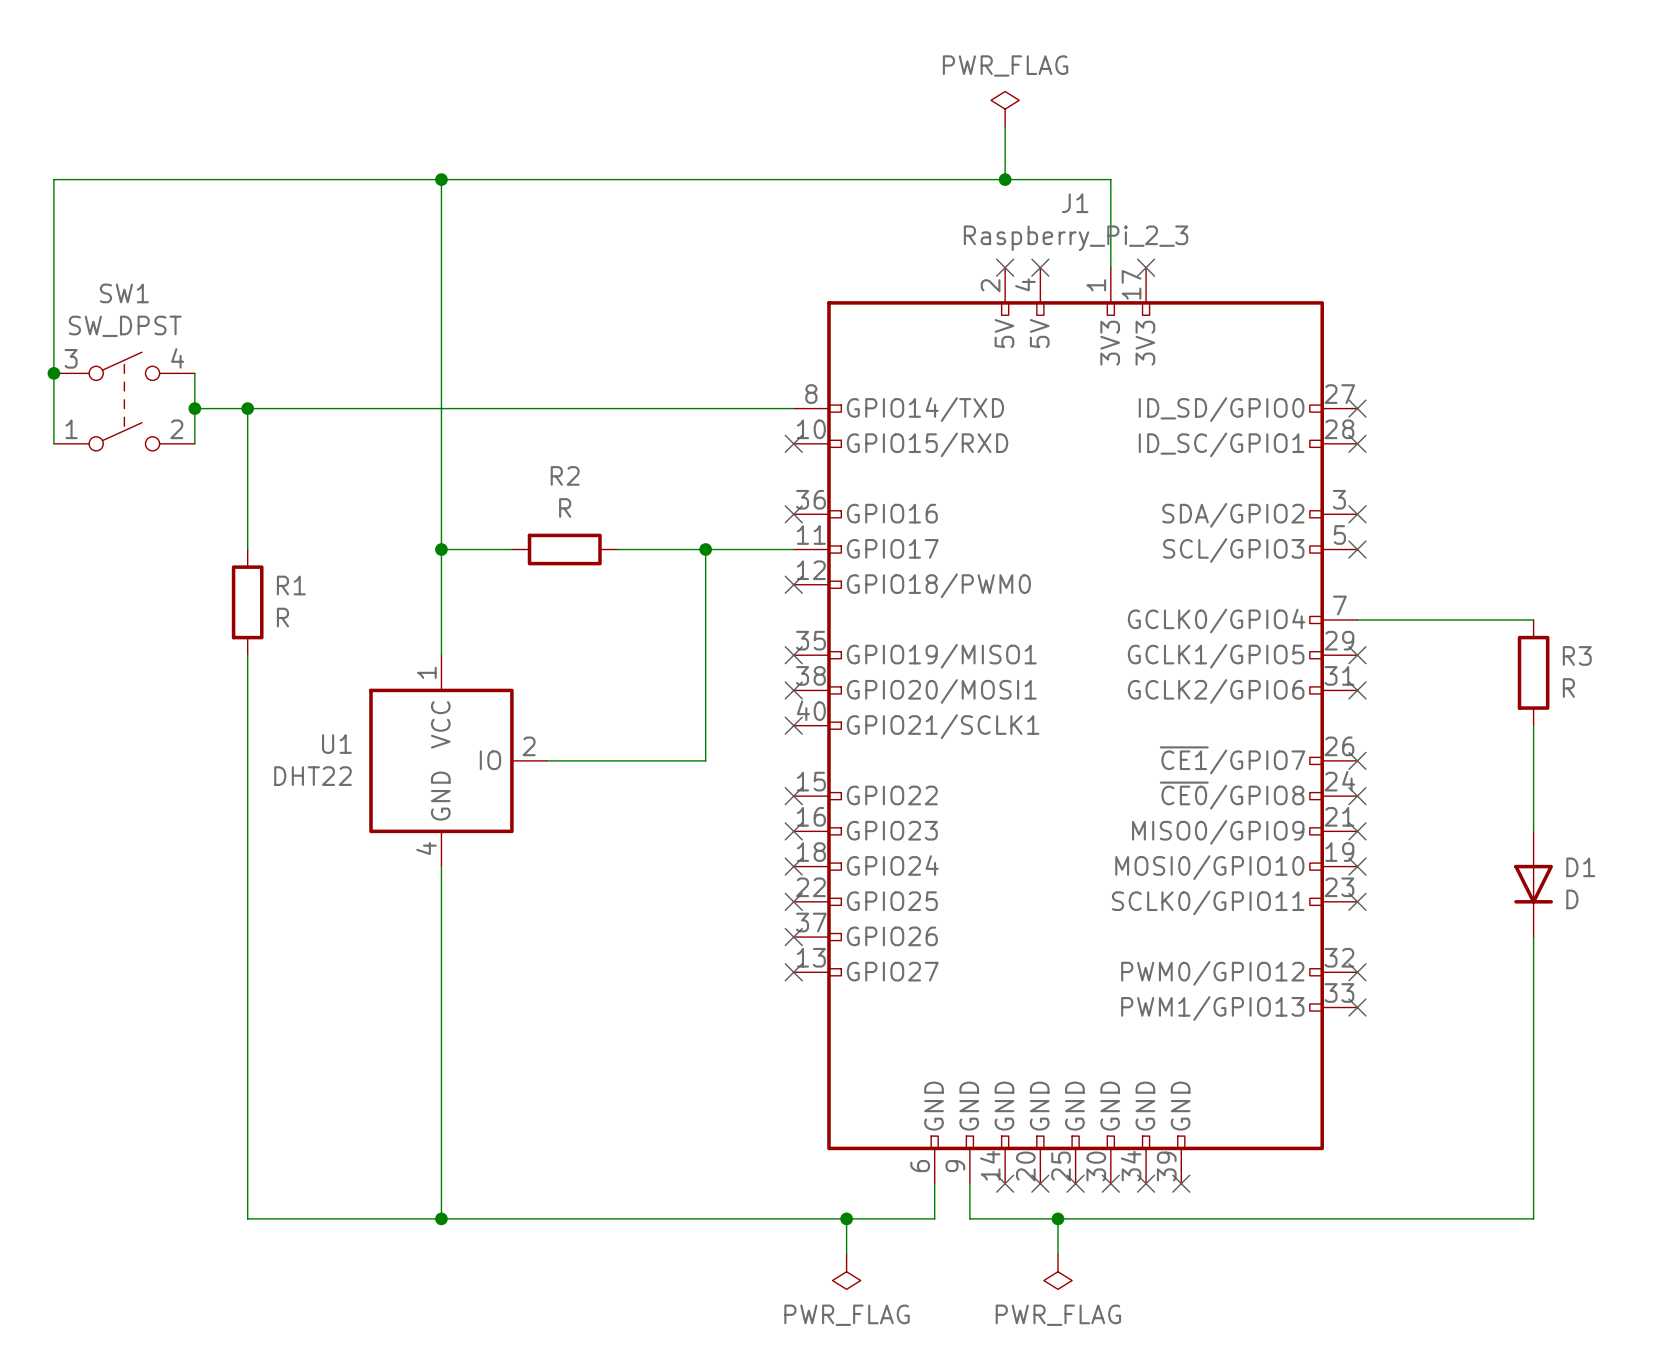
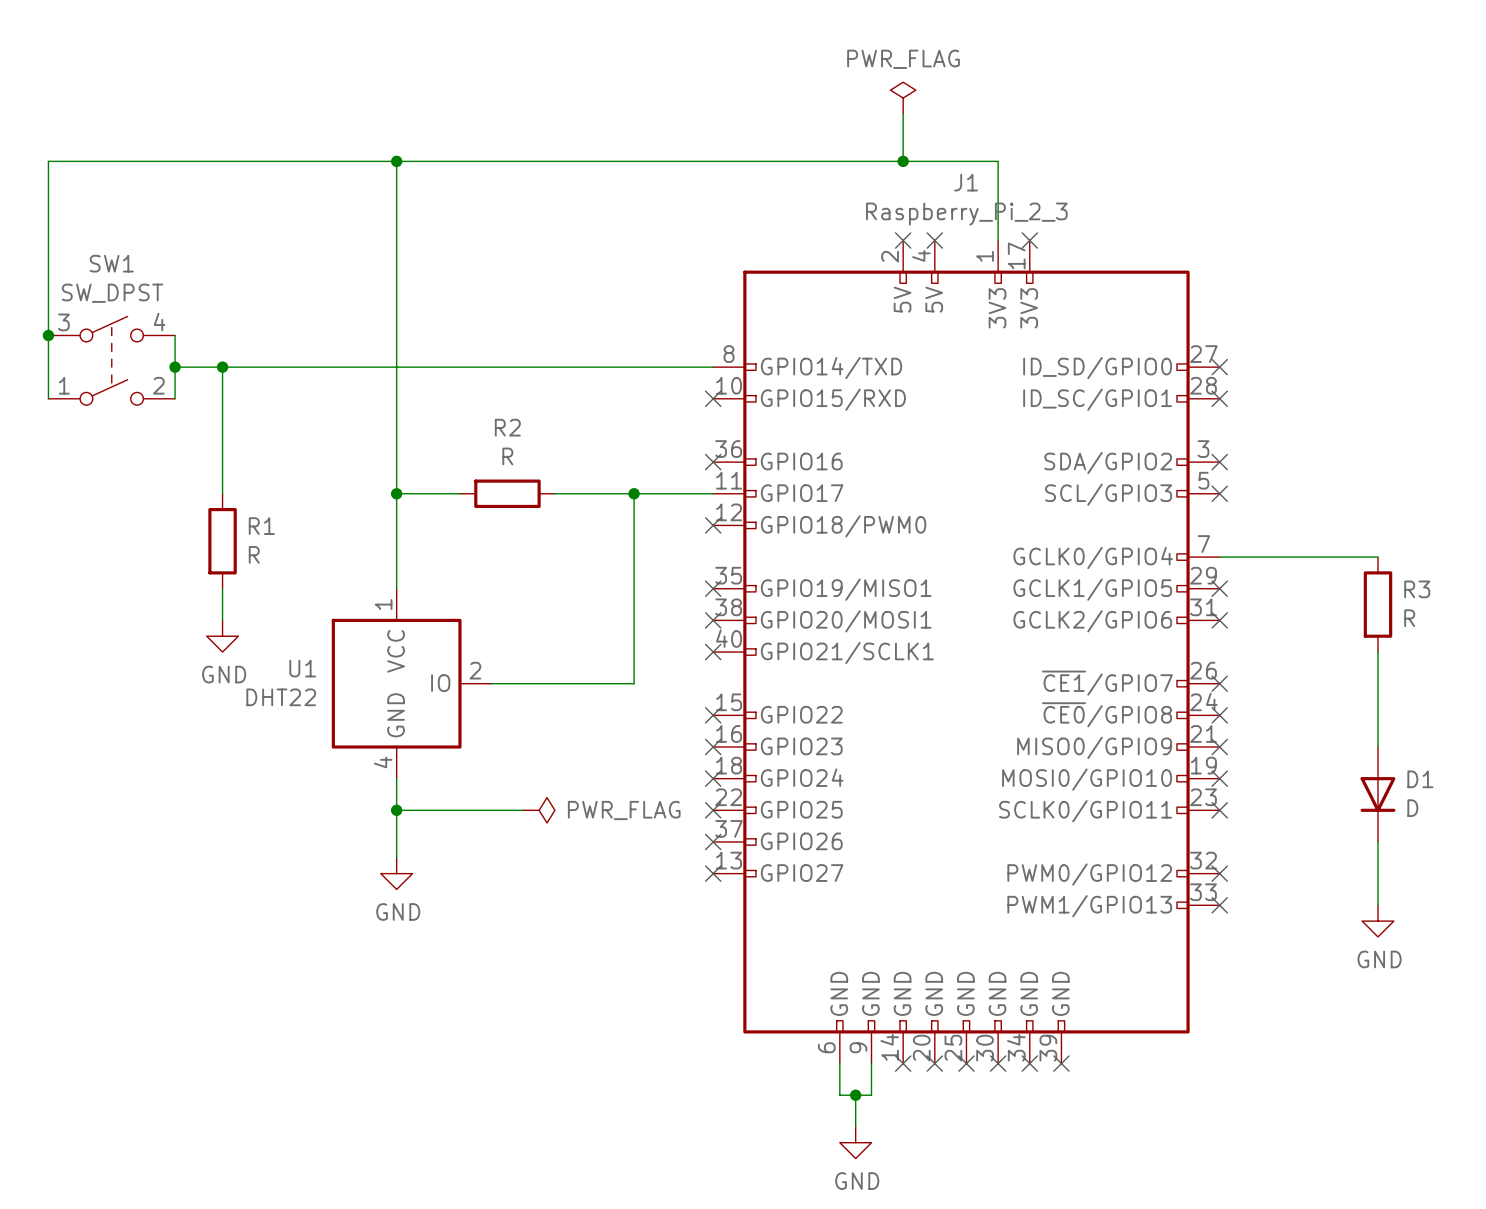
wire: (247, 690) (247, 1218) (934, 1218) -> none
power symbol: none -> GND (222, 636)
wire: none -> (396, 810) (523, 810)
junction: none -> (396, 810)
power symbol: none -> PWR_FLAG (539, 810)
wire: (441, 954) (441, 1218) -> none
power symbol: none -> GND (396, 873)
wire: (1533, 1007) (1533, 1218) (969, 1218) -> (839, 1095) (871, 1095)
power symbol: none -> GND (1377, 921)
junction: (441, 1218) -> none
wire: (846, 1218) (846, 1254) -> none
junction: (846, 1218) -> none
junction: none -> (855, 1095)
wire: (1057, 1218) (1057, 1254) -> (855, 1095) (855, 1126)
junction: (1057, 1218) -> none
power symbol: PWR_FLAG (846, 1271) -> none
power symbol: none -> GND (855, 1142)
power symbol: PWR_FLAG (1057, 1271) -> none

